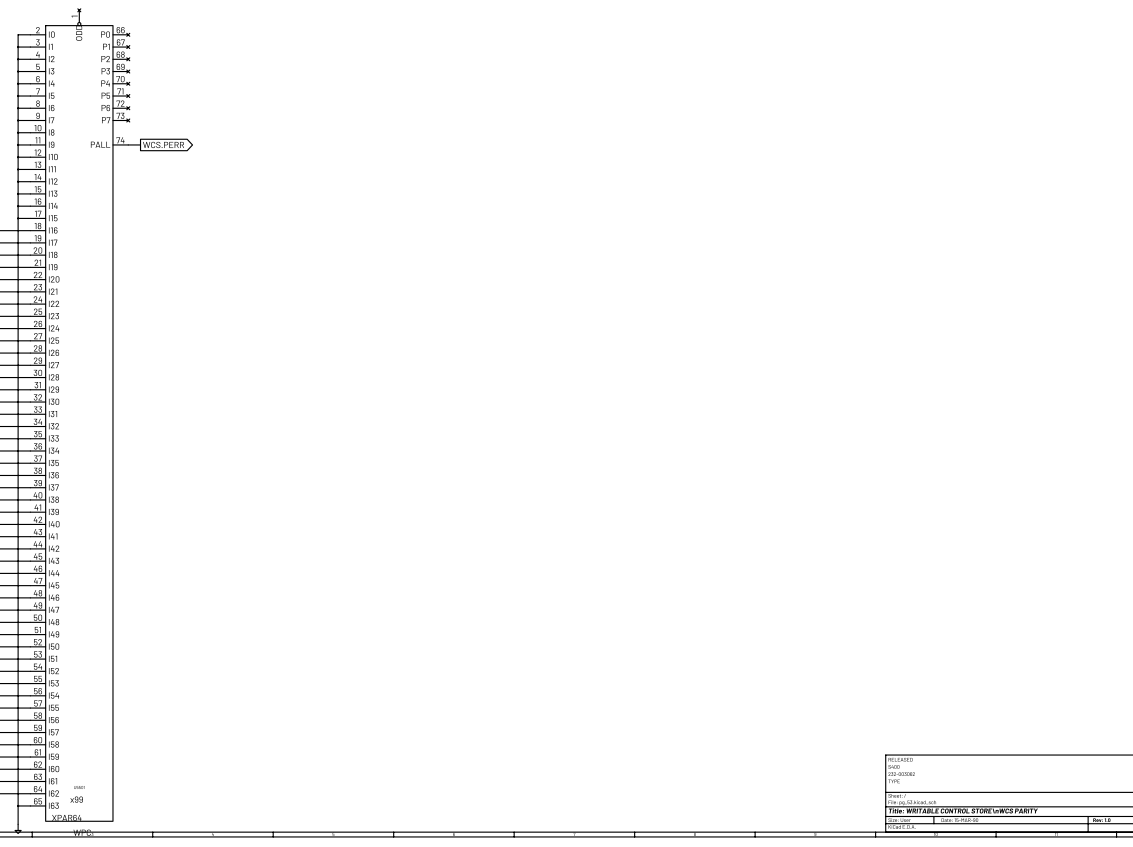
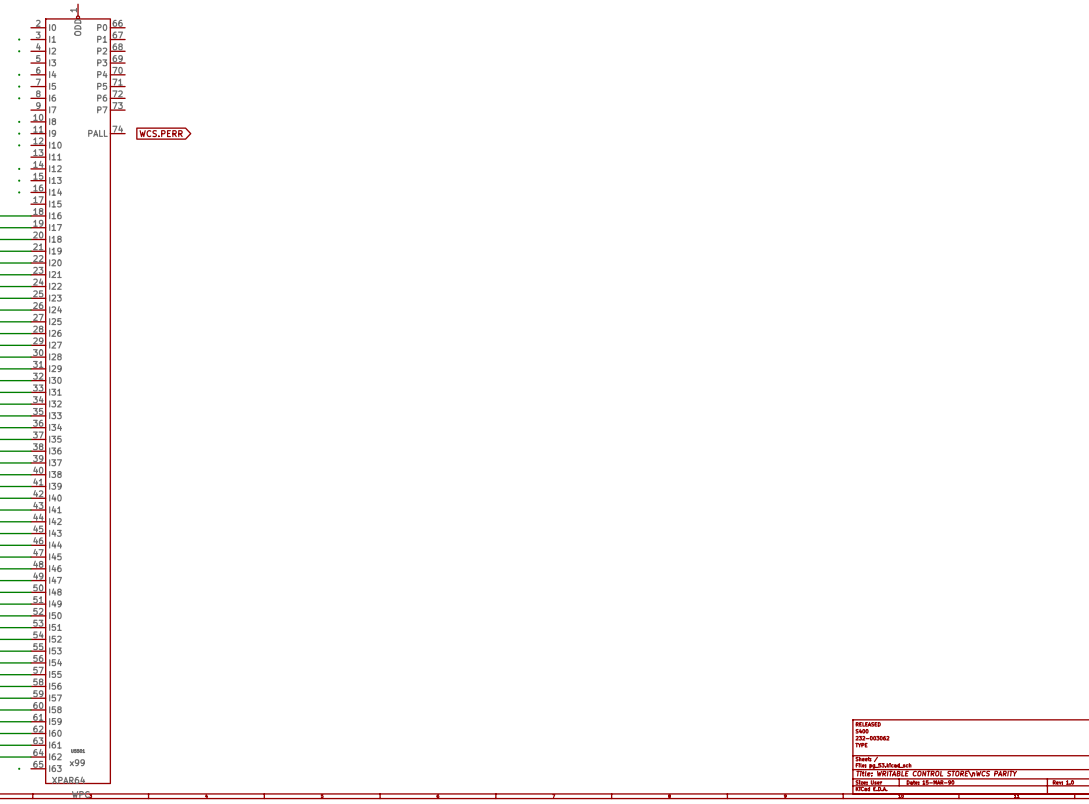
no-connect mark: (79, 10) -> none
wire: (30, 34) (18, 34) (18, 824) -> none
no-connect mark: (128, 34) -> none
wire: (18, 47) (30, 47) -> none
no-connect mark: (128, 47) -> none
wire: (18, 59) (30, 59) -> none
no-connect mark: (128, 59) -> none
wire: (18, 71) (30, 71) -> none
no-connect mark: (128, 71) -> none
wire: (18, 83) (30, 83) -> none
no-connect mark: (128, 83) -> none
wire: (18, 96) (30, 96) -> none
no-connect mark: (128, 96) -> none
wire: (18, 108) (30, 108) -> none
no-connect mark: (128, 108) -> none
wire: (18, 120) (30, 120) -> none
no-connect mark: (128, 120) -> none
wire: (18, 132) (30, 132) -> none
wire: (18, 144) (30, 144) -> none
wire: (128, 144) (140, 144) -> none
wire: (18, 157) (30, 157) -> none
wire: (18, 169) (30, 169) -> none
wire: (18, 181) (30, 181) -> none
wire: (18, 193) (30, 193) -> none
wire: (18, 206) (30, 206) -> none
wire: (18, 218) (30, 218) -> none
wire: (18, 805) (30, 805) -> none
power symbol: (18, 829) -> none

